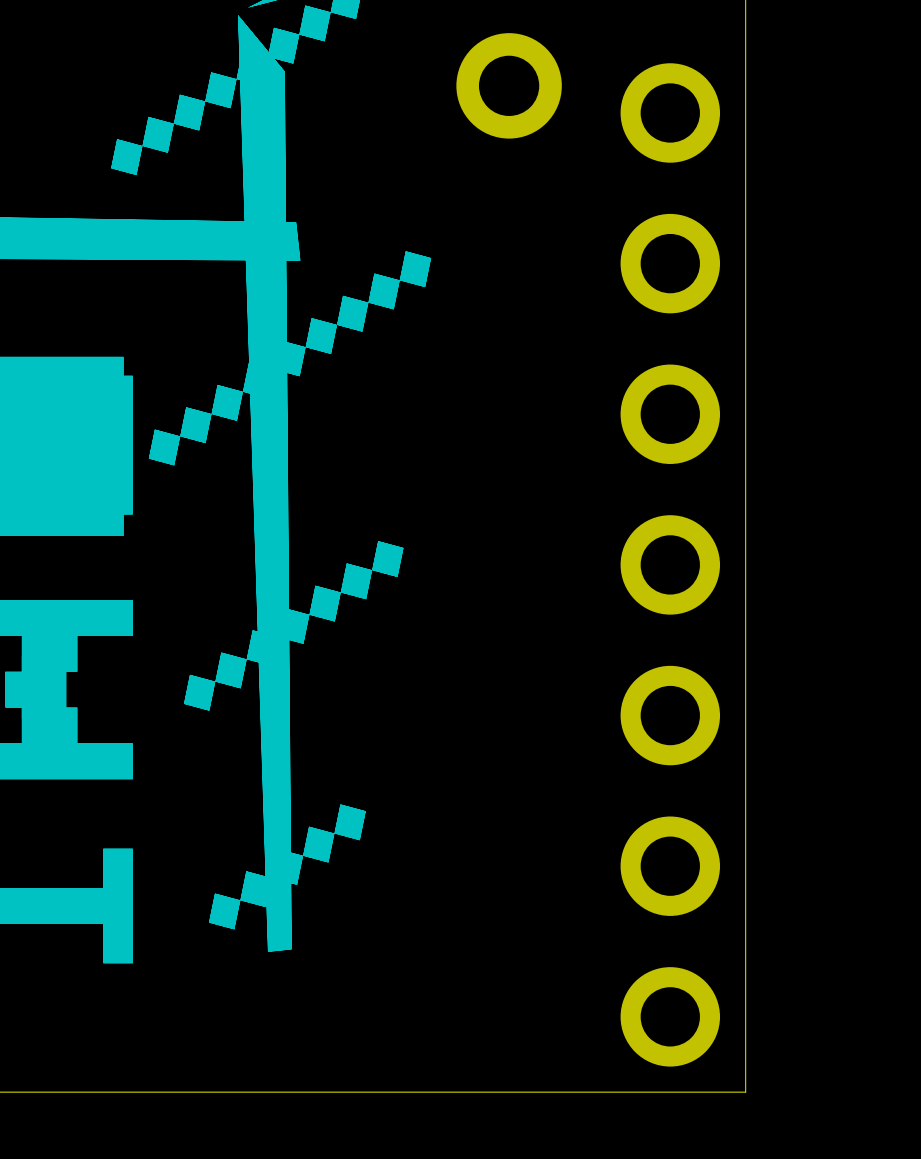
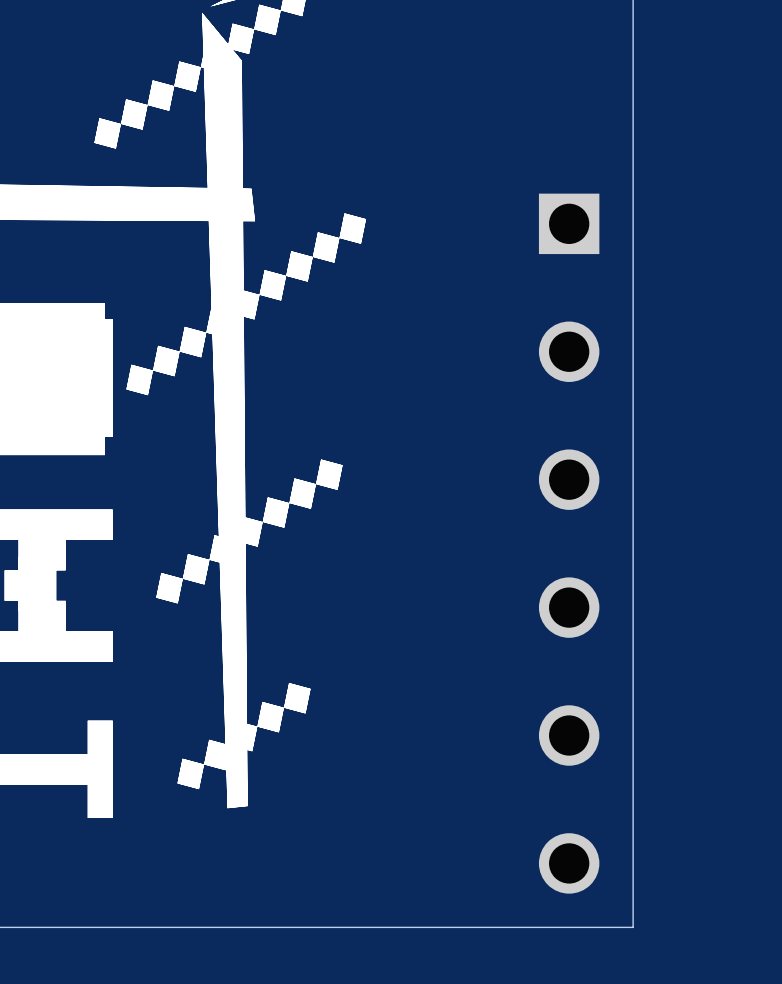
part: (509, 85) -> none
part: (670, 564) -> none
part: none -> (569, 543)

